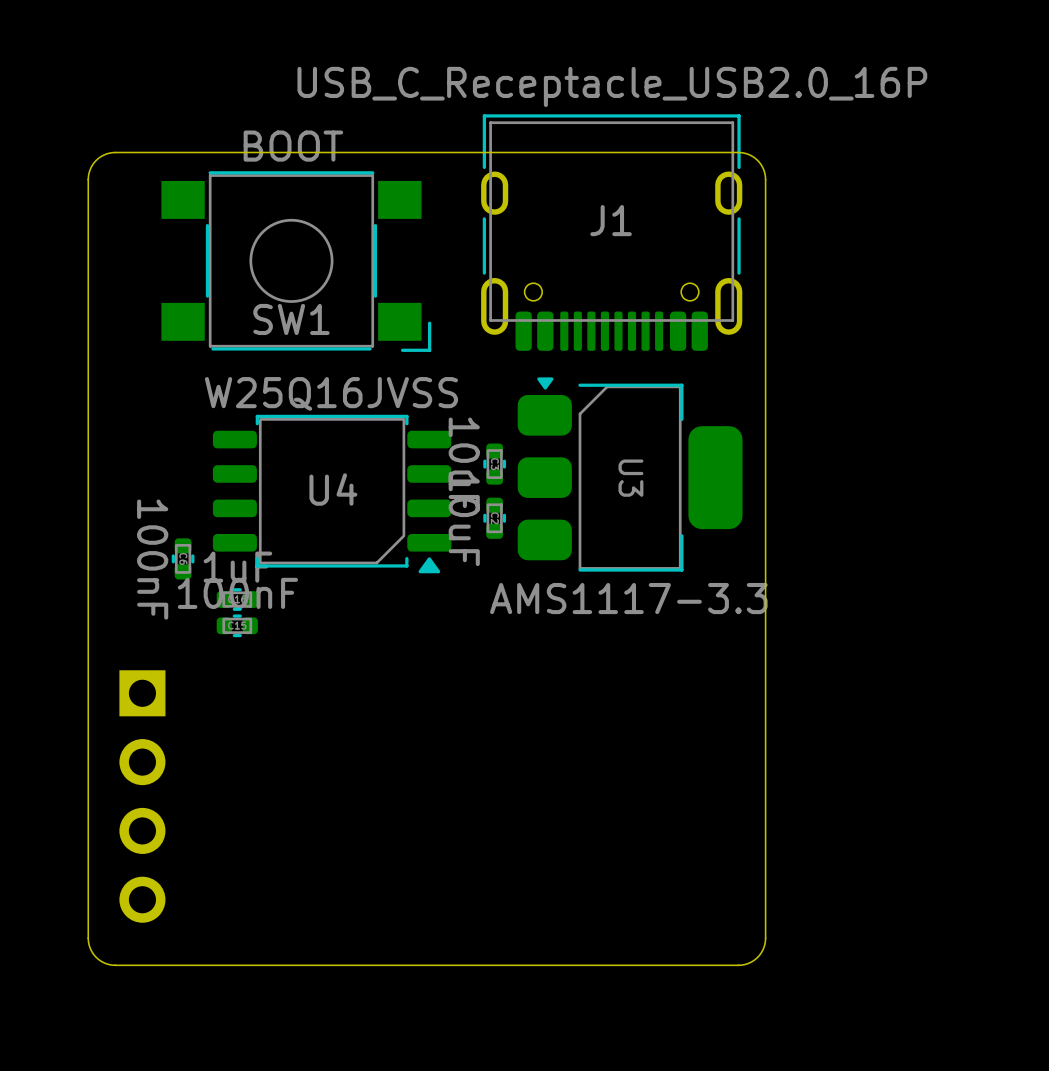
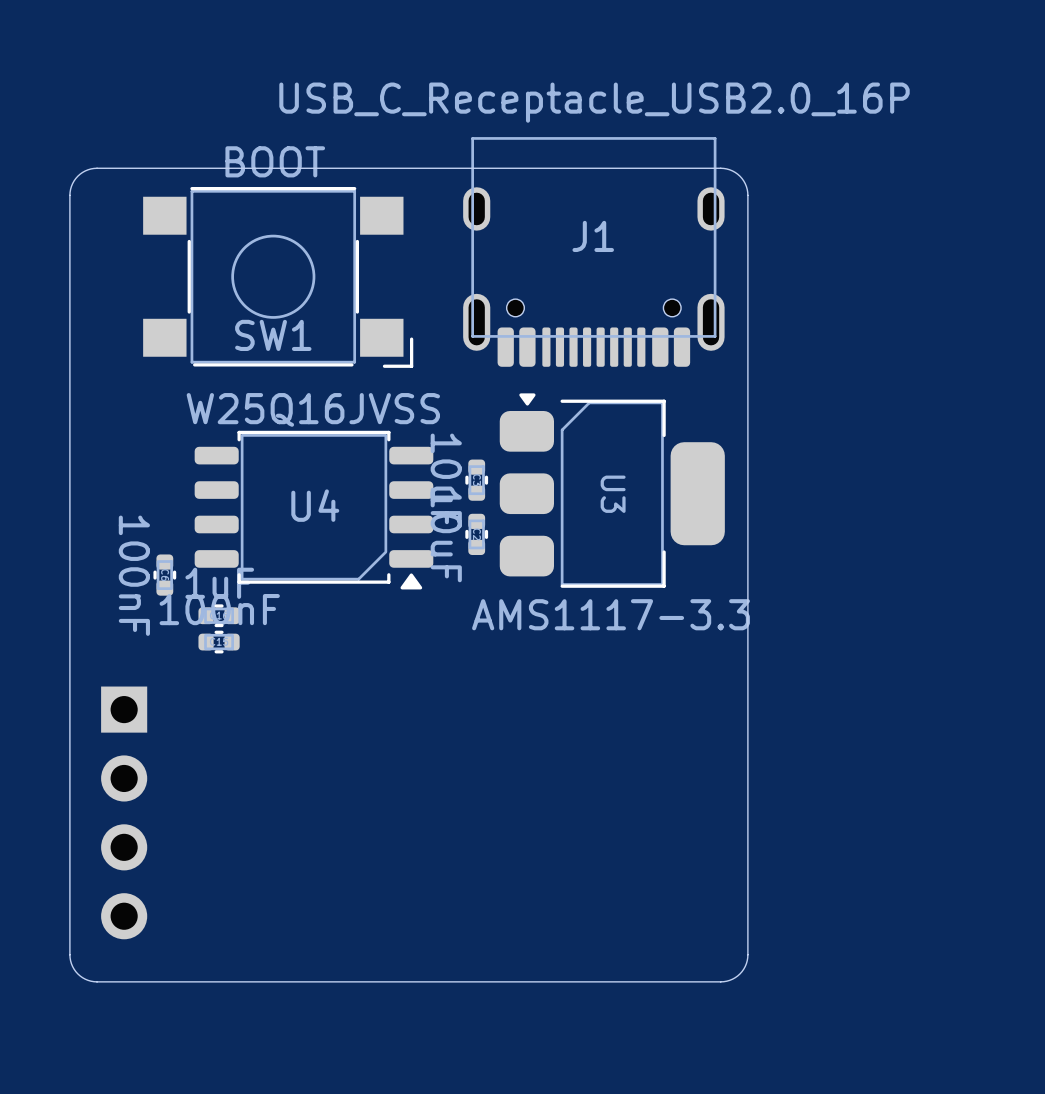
J1 footprint: [481, 114, 743, 351] -> [463, 137, 725, 367]

